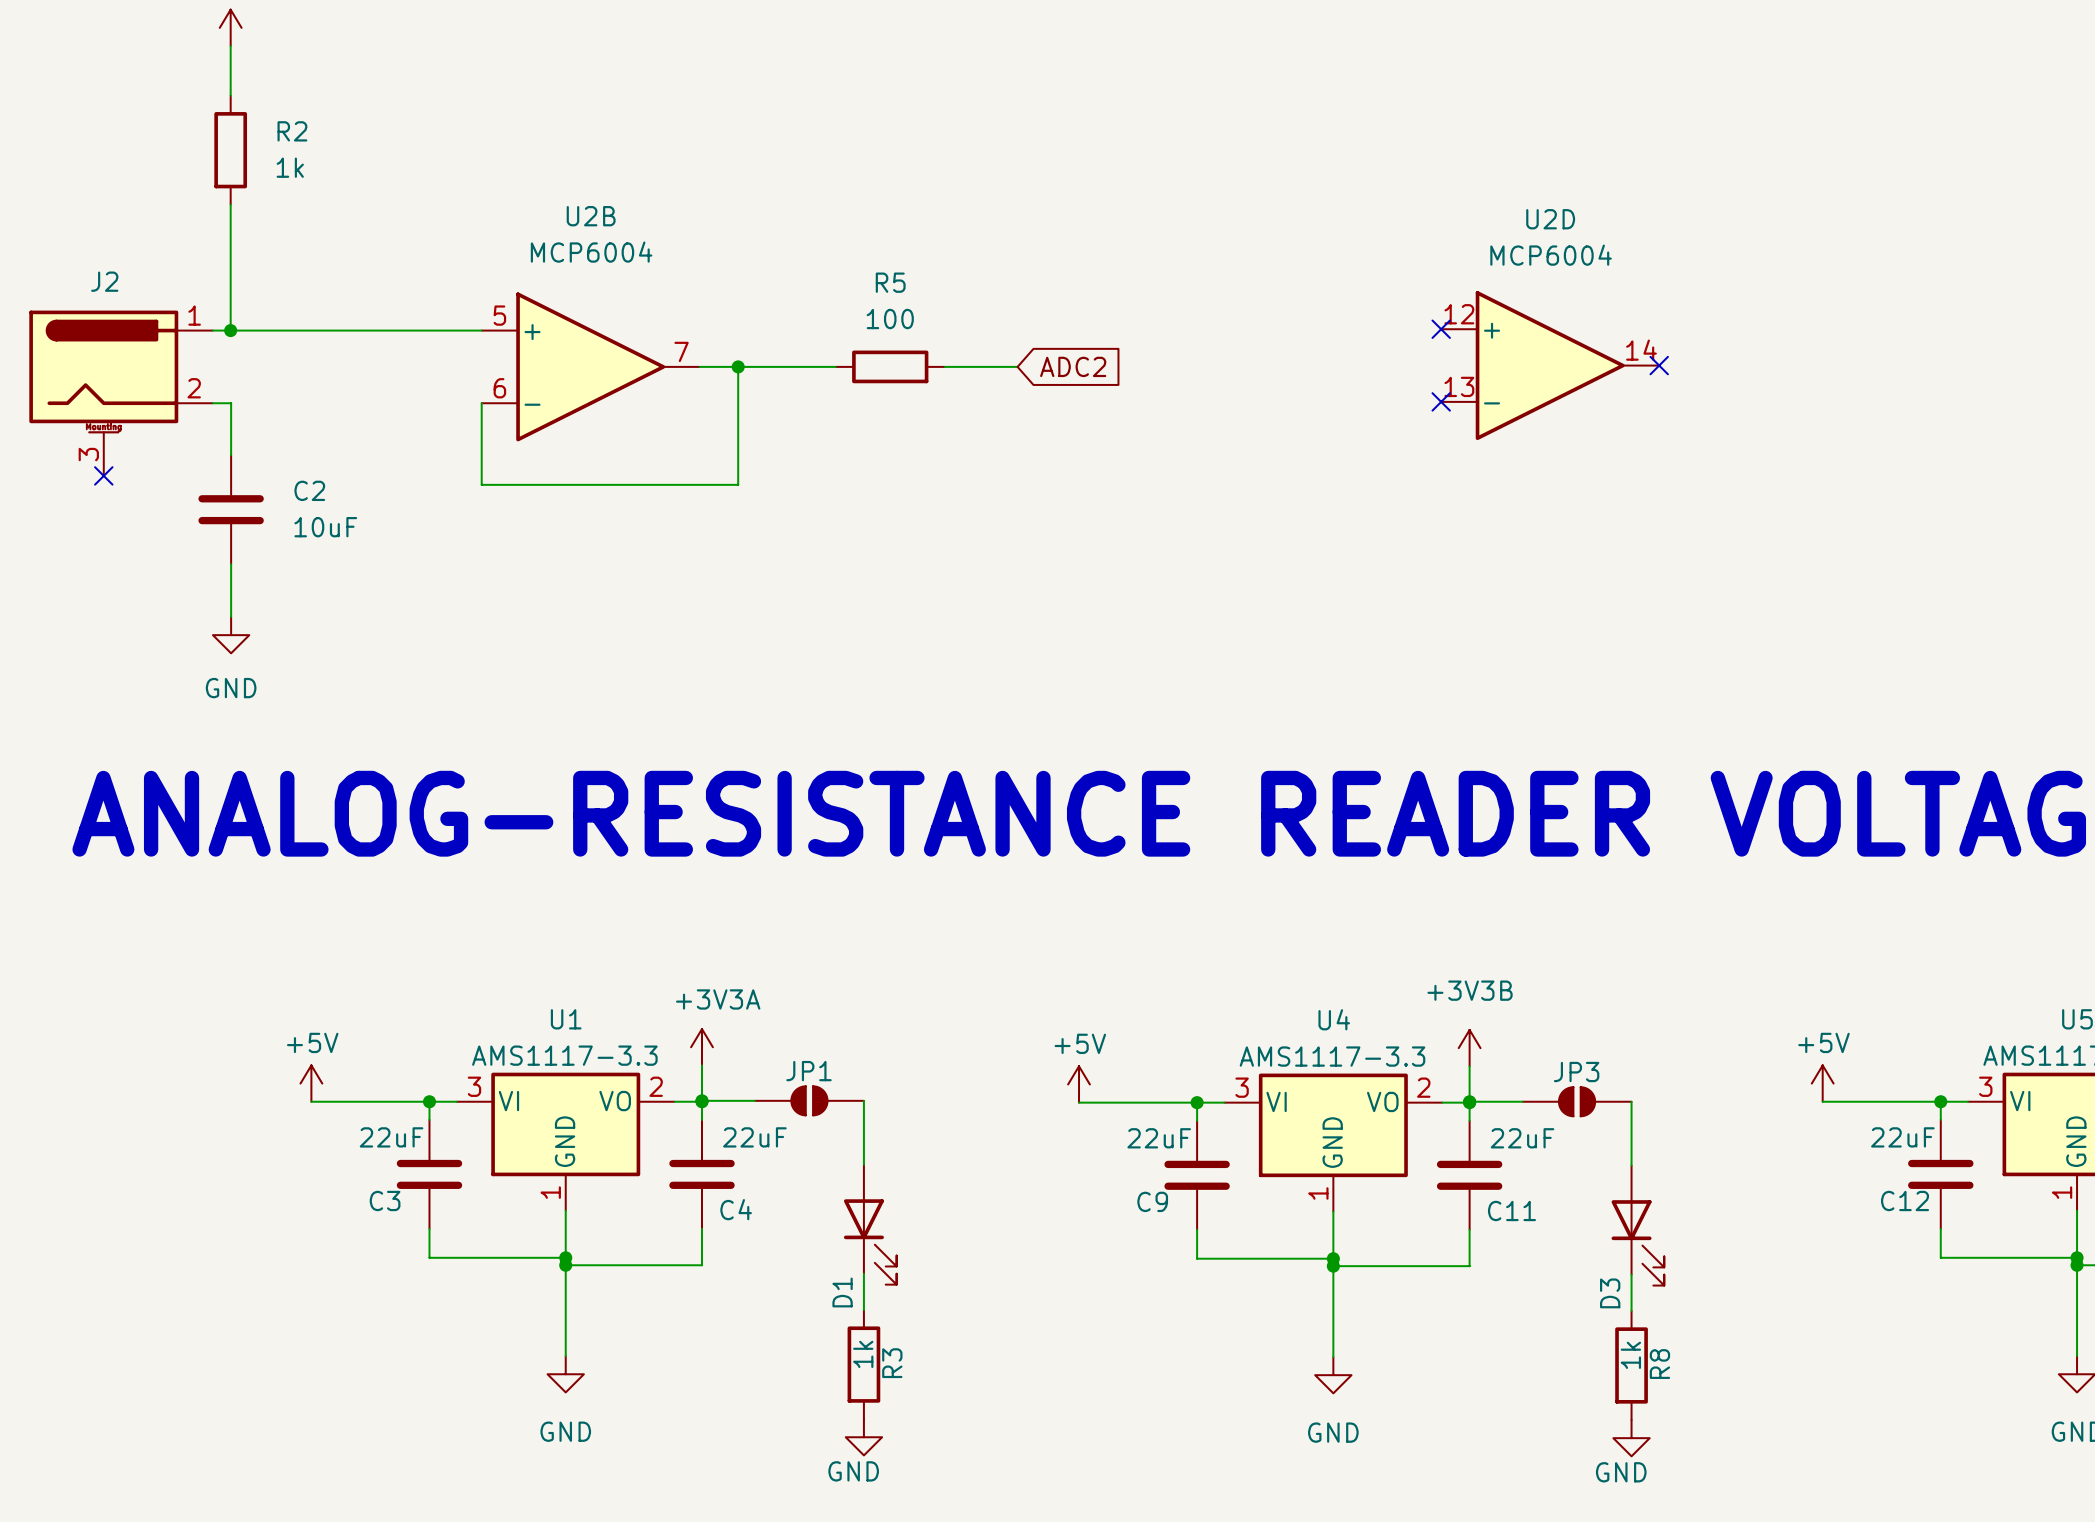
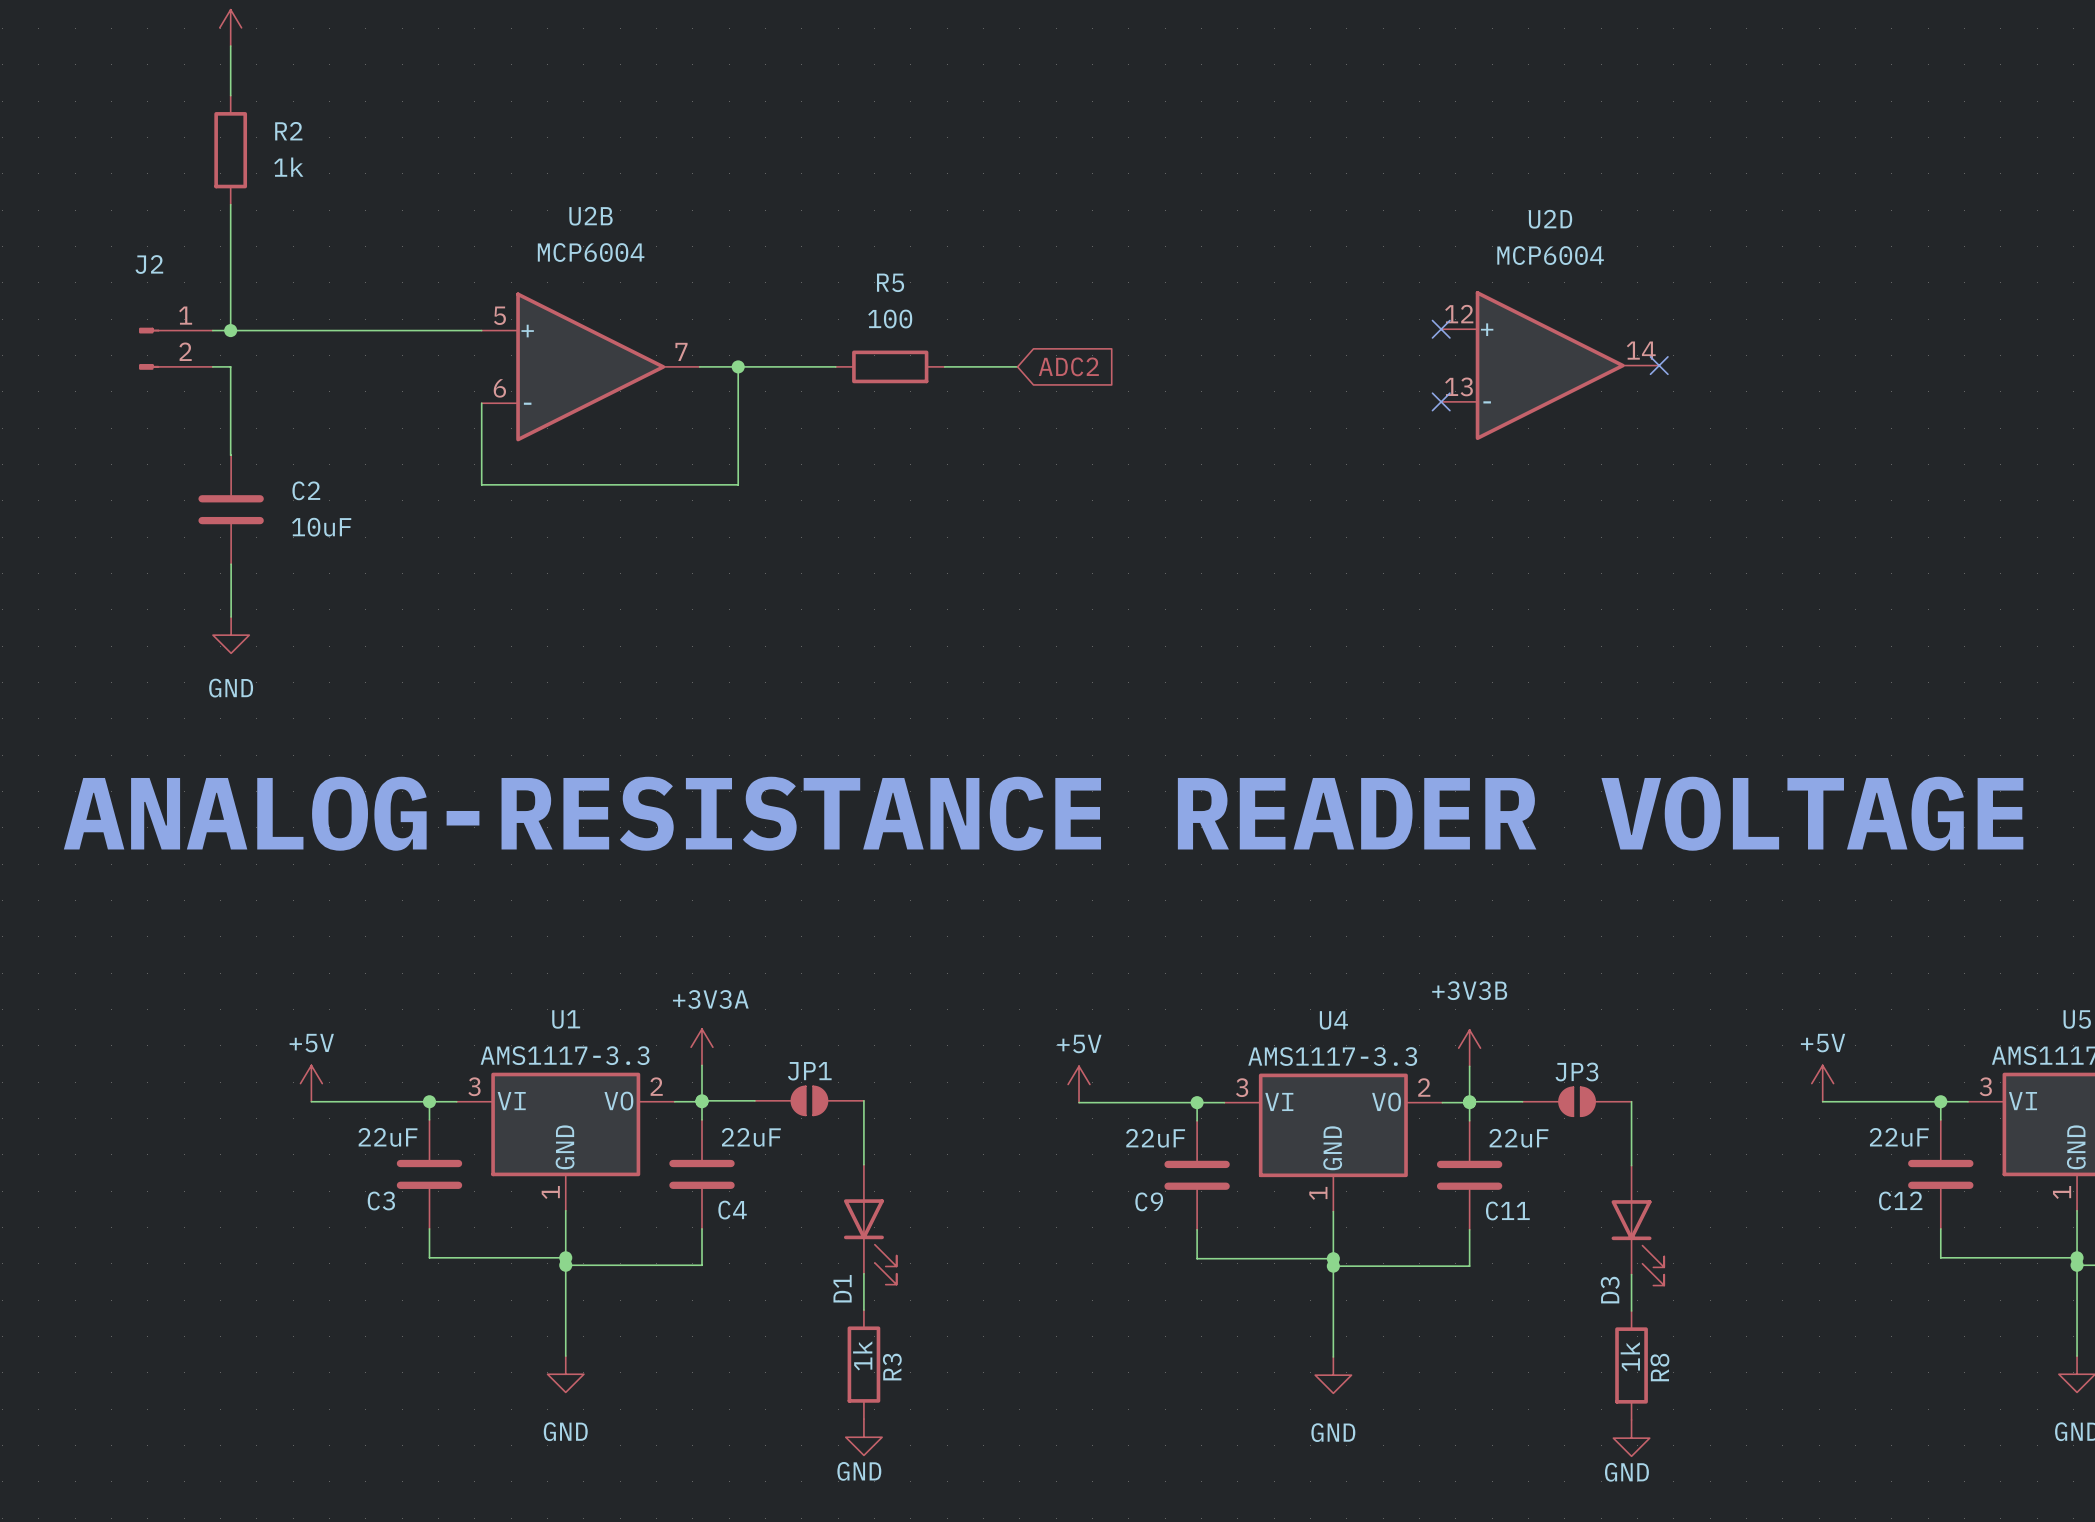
J2 name position: J2 (104, 281) -> J2 (149, 264)
J2 symbol: [29, 310, 213, 476] -> [139, 327, 213, 370]
wire: (212, 403) (231, 403) (231, 455) -> (212, 366) (230, 366) (231, 455)
no-connect mark: (103, 475) -> none

